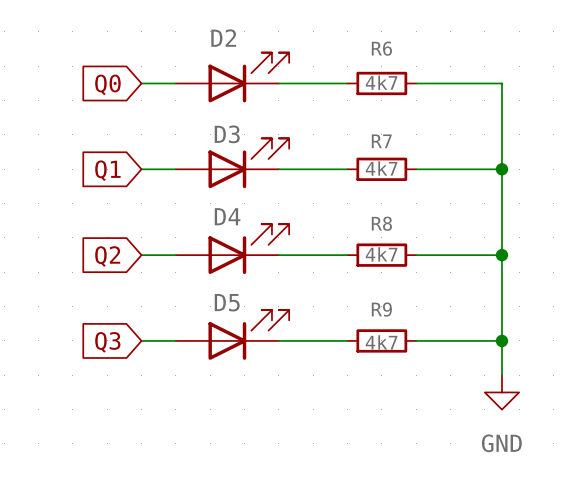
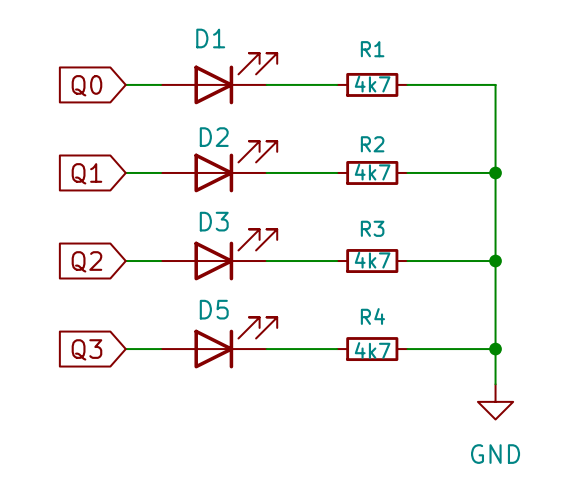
D2 name: D2 (223, 38) -> D1 (210, 38)
R6 name: R6 (381, 48) -> R1 (372, 49)
D3 name: D3 (227, 134) -> D2 (214, 137)
R7 name: R7 (381, 141) -> R2 (372, 144)
D4 name: D4 (227, 216) -> D3 (214, 221)
R8 name: R8 (381, 223) -> R3 (372, 228)
R9 name: R9 (381, 309) -> R4 (372, 316)

